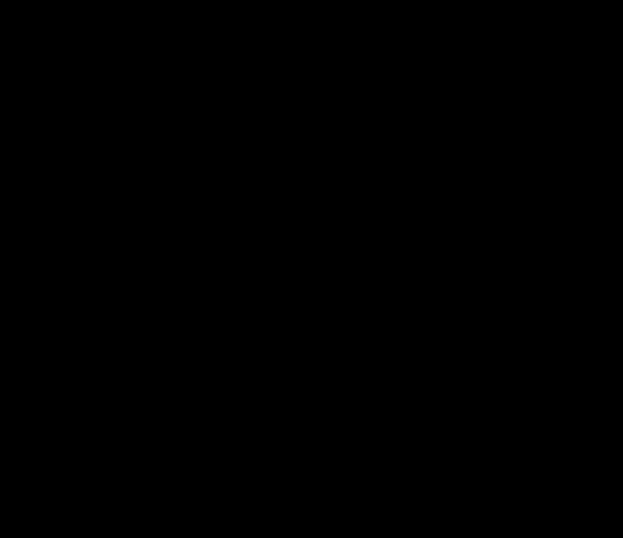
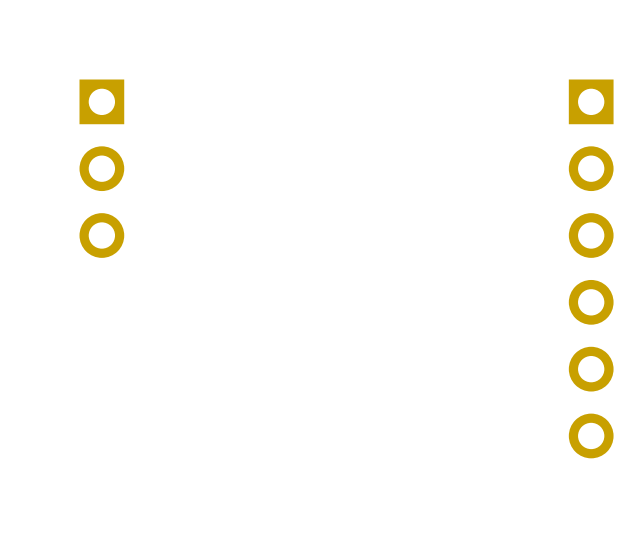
part: none -> (101, 168)
part: none -> (591, 268)

